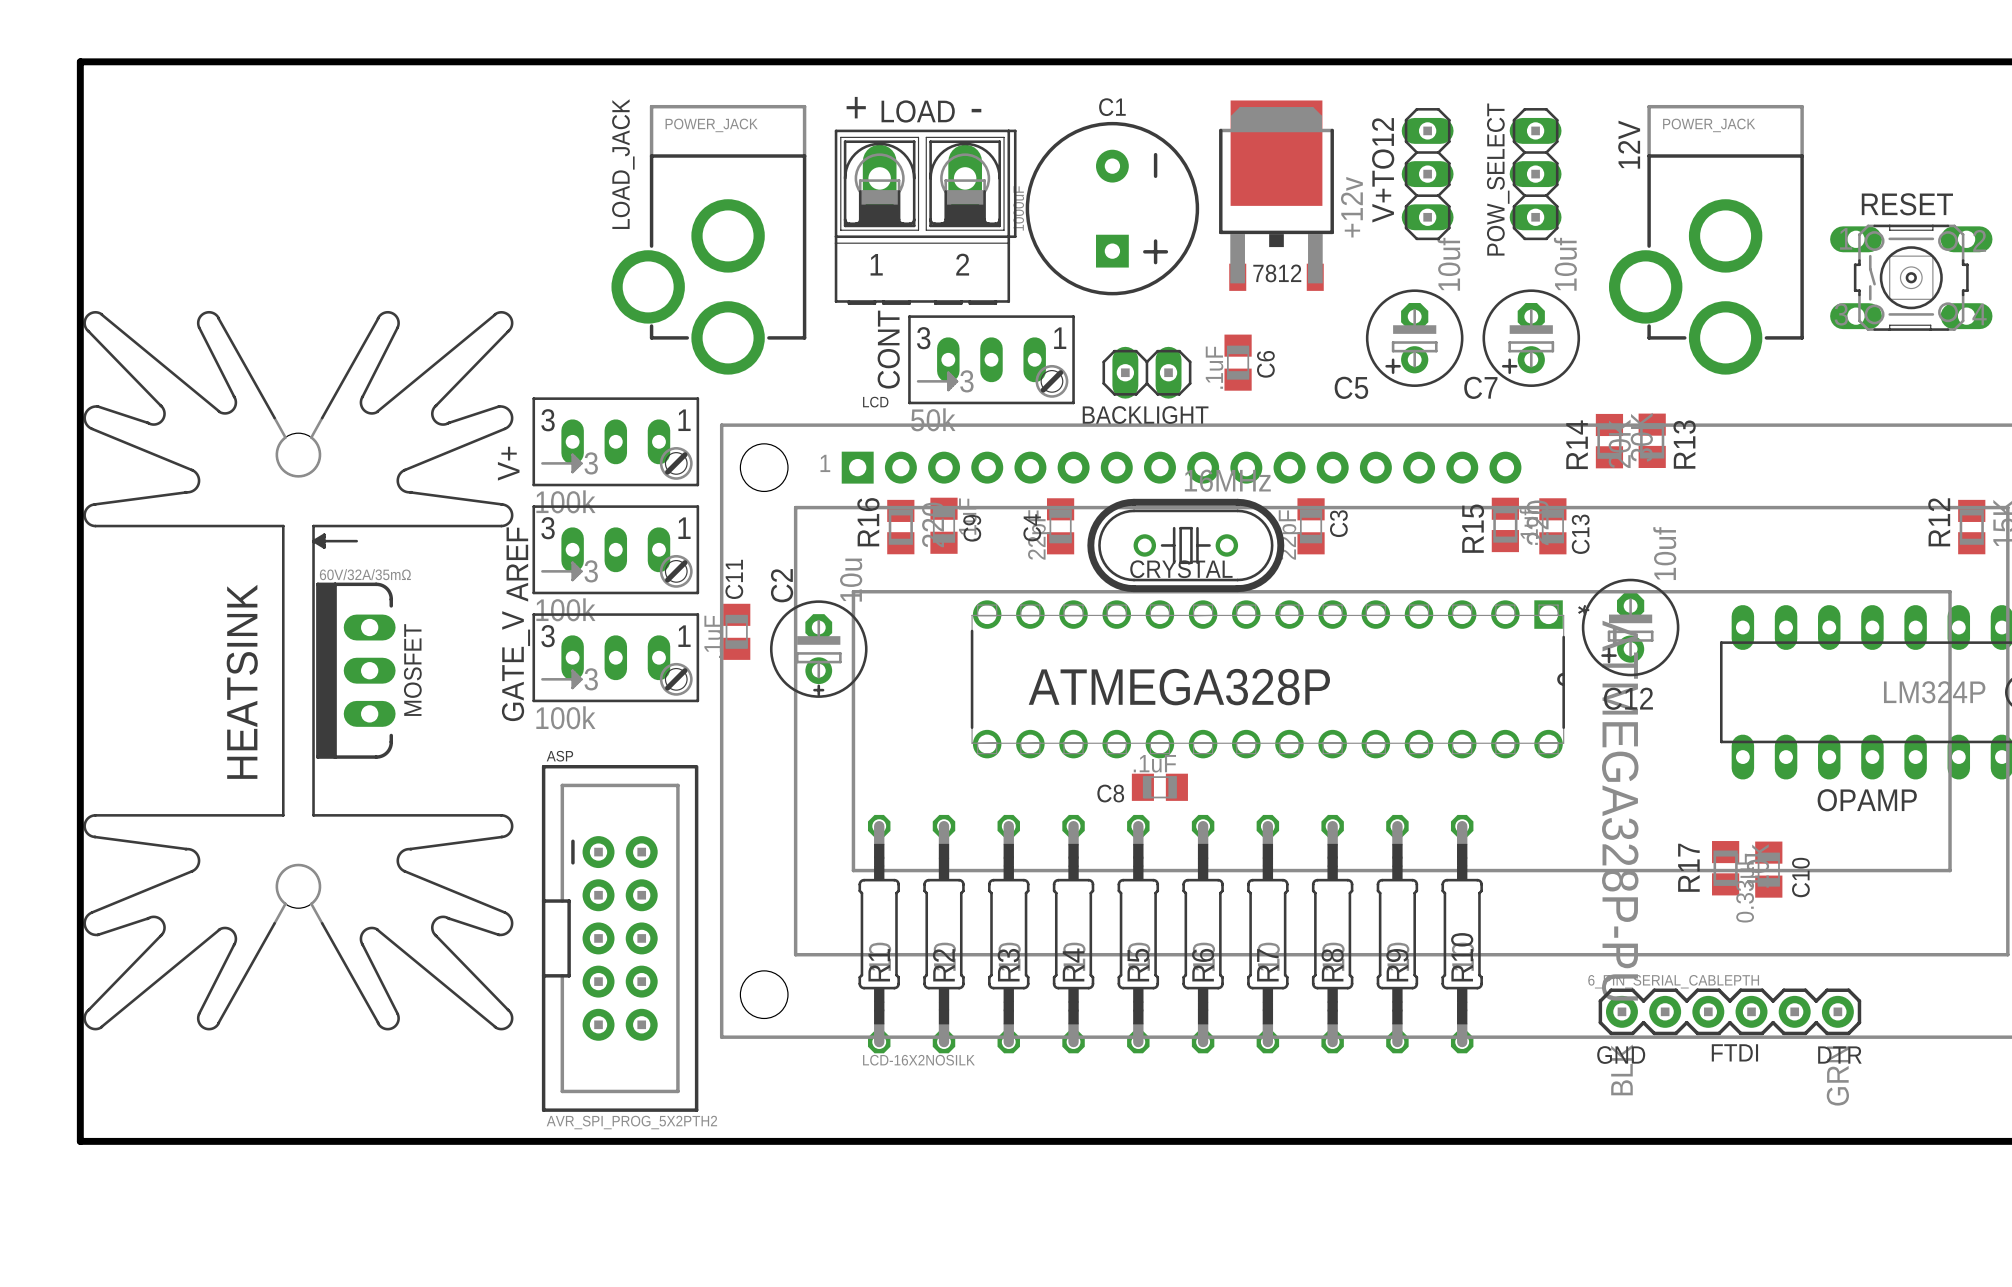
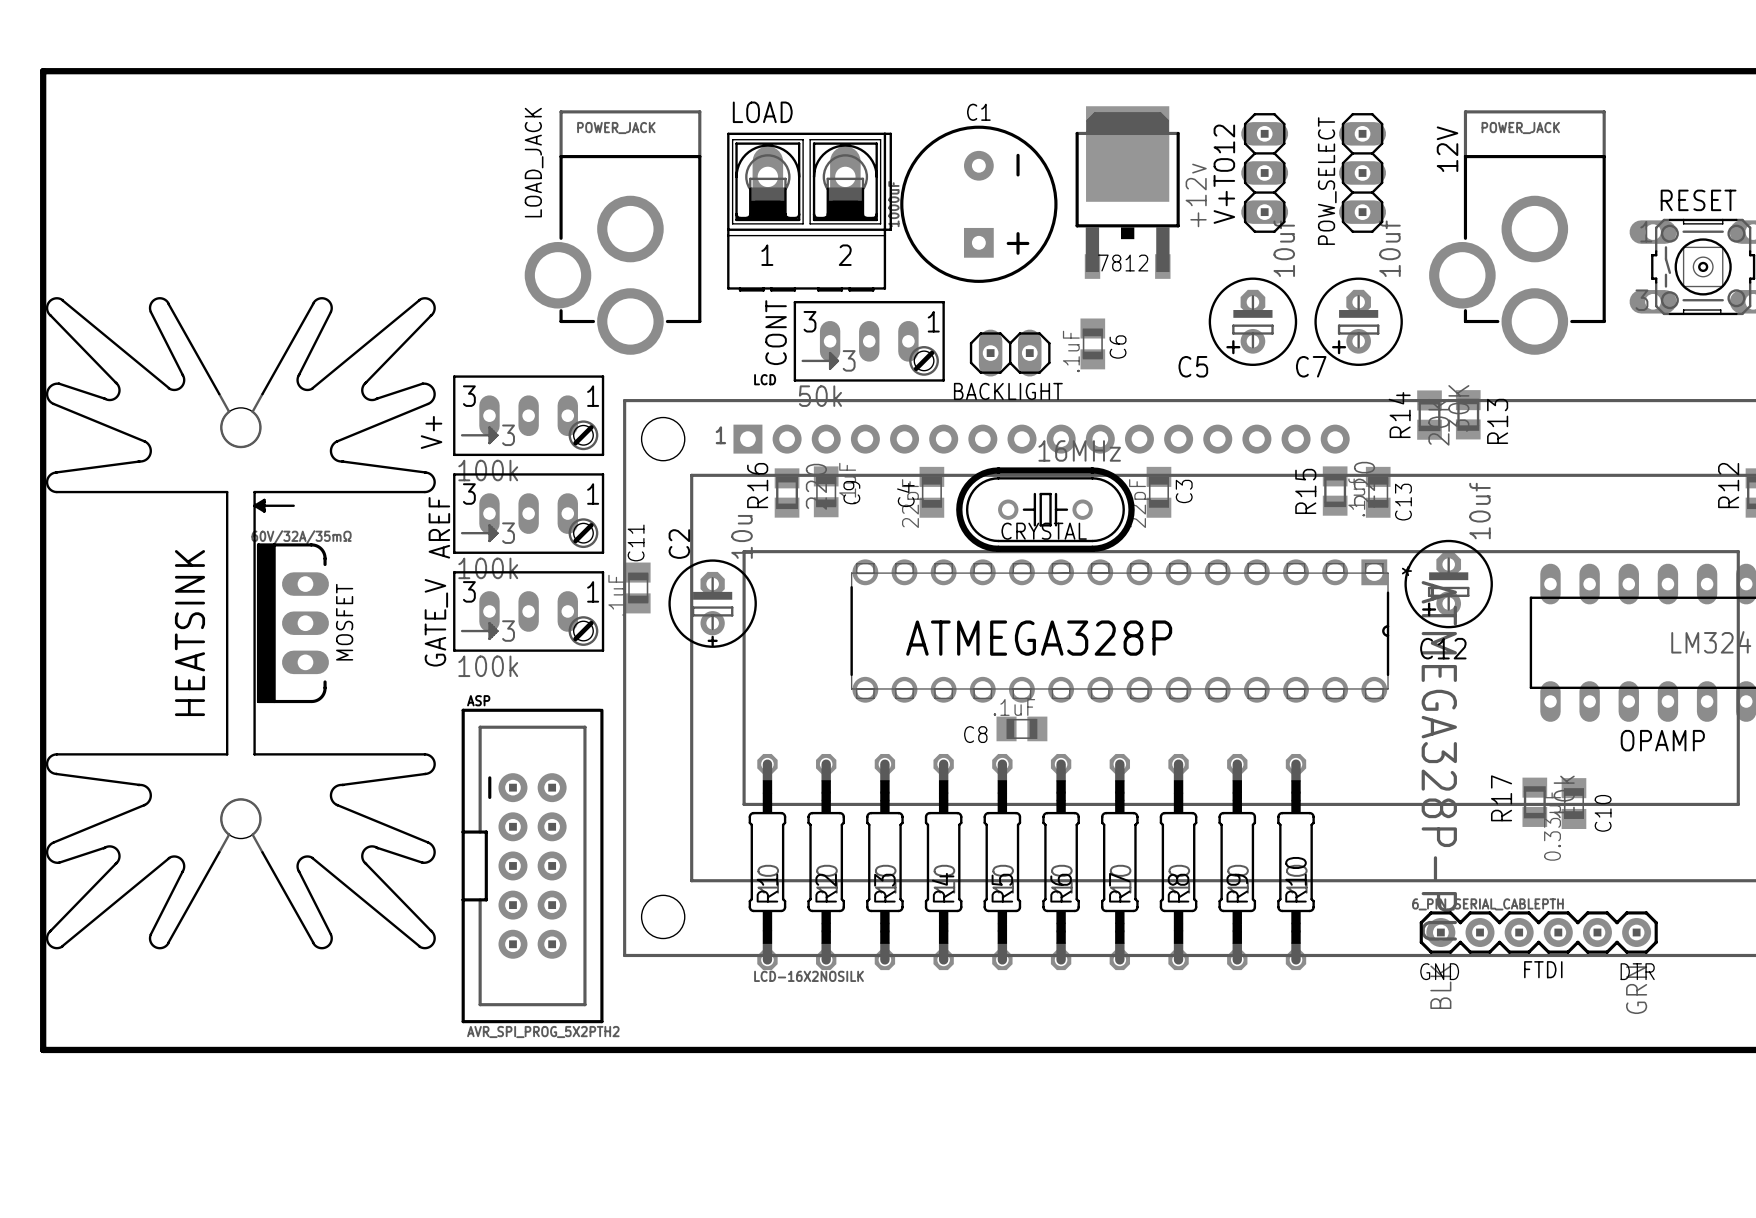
text: + (856, 107) -> none
text: - (976, 110) -> none
LOAD name position: LOAD (918, 111) -> LOAD (762, 112)

